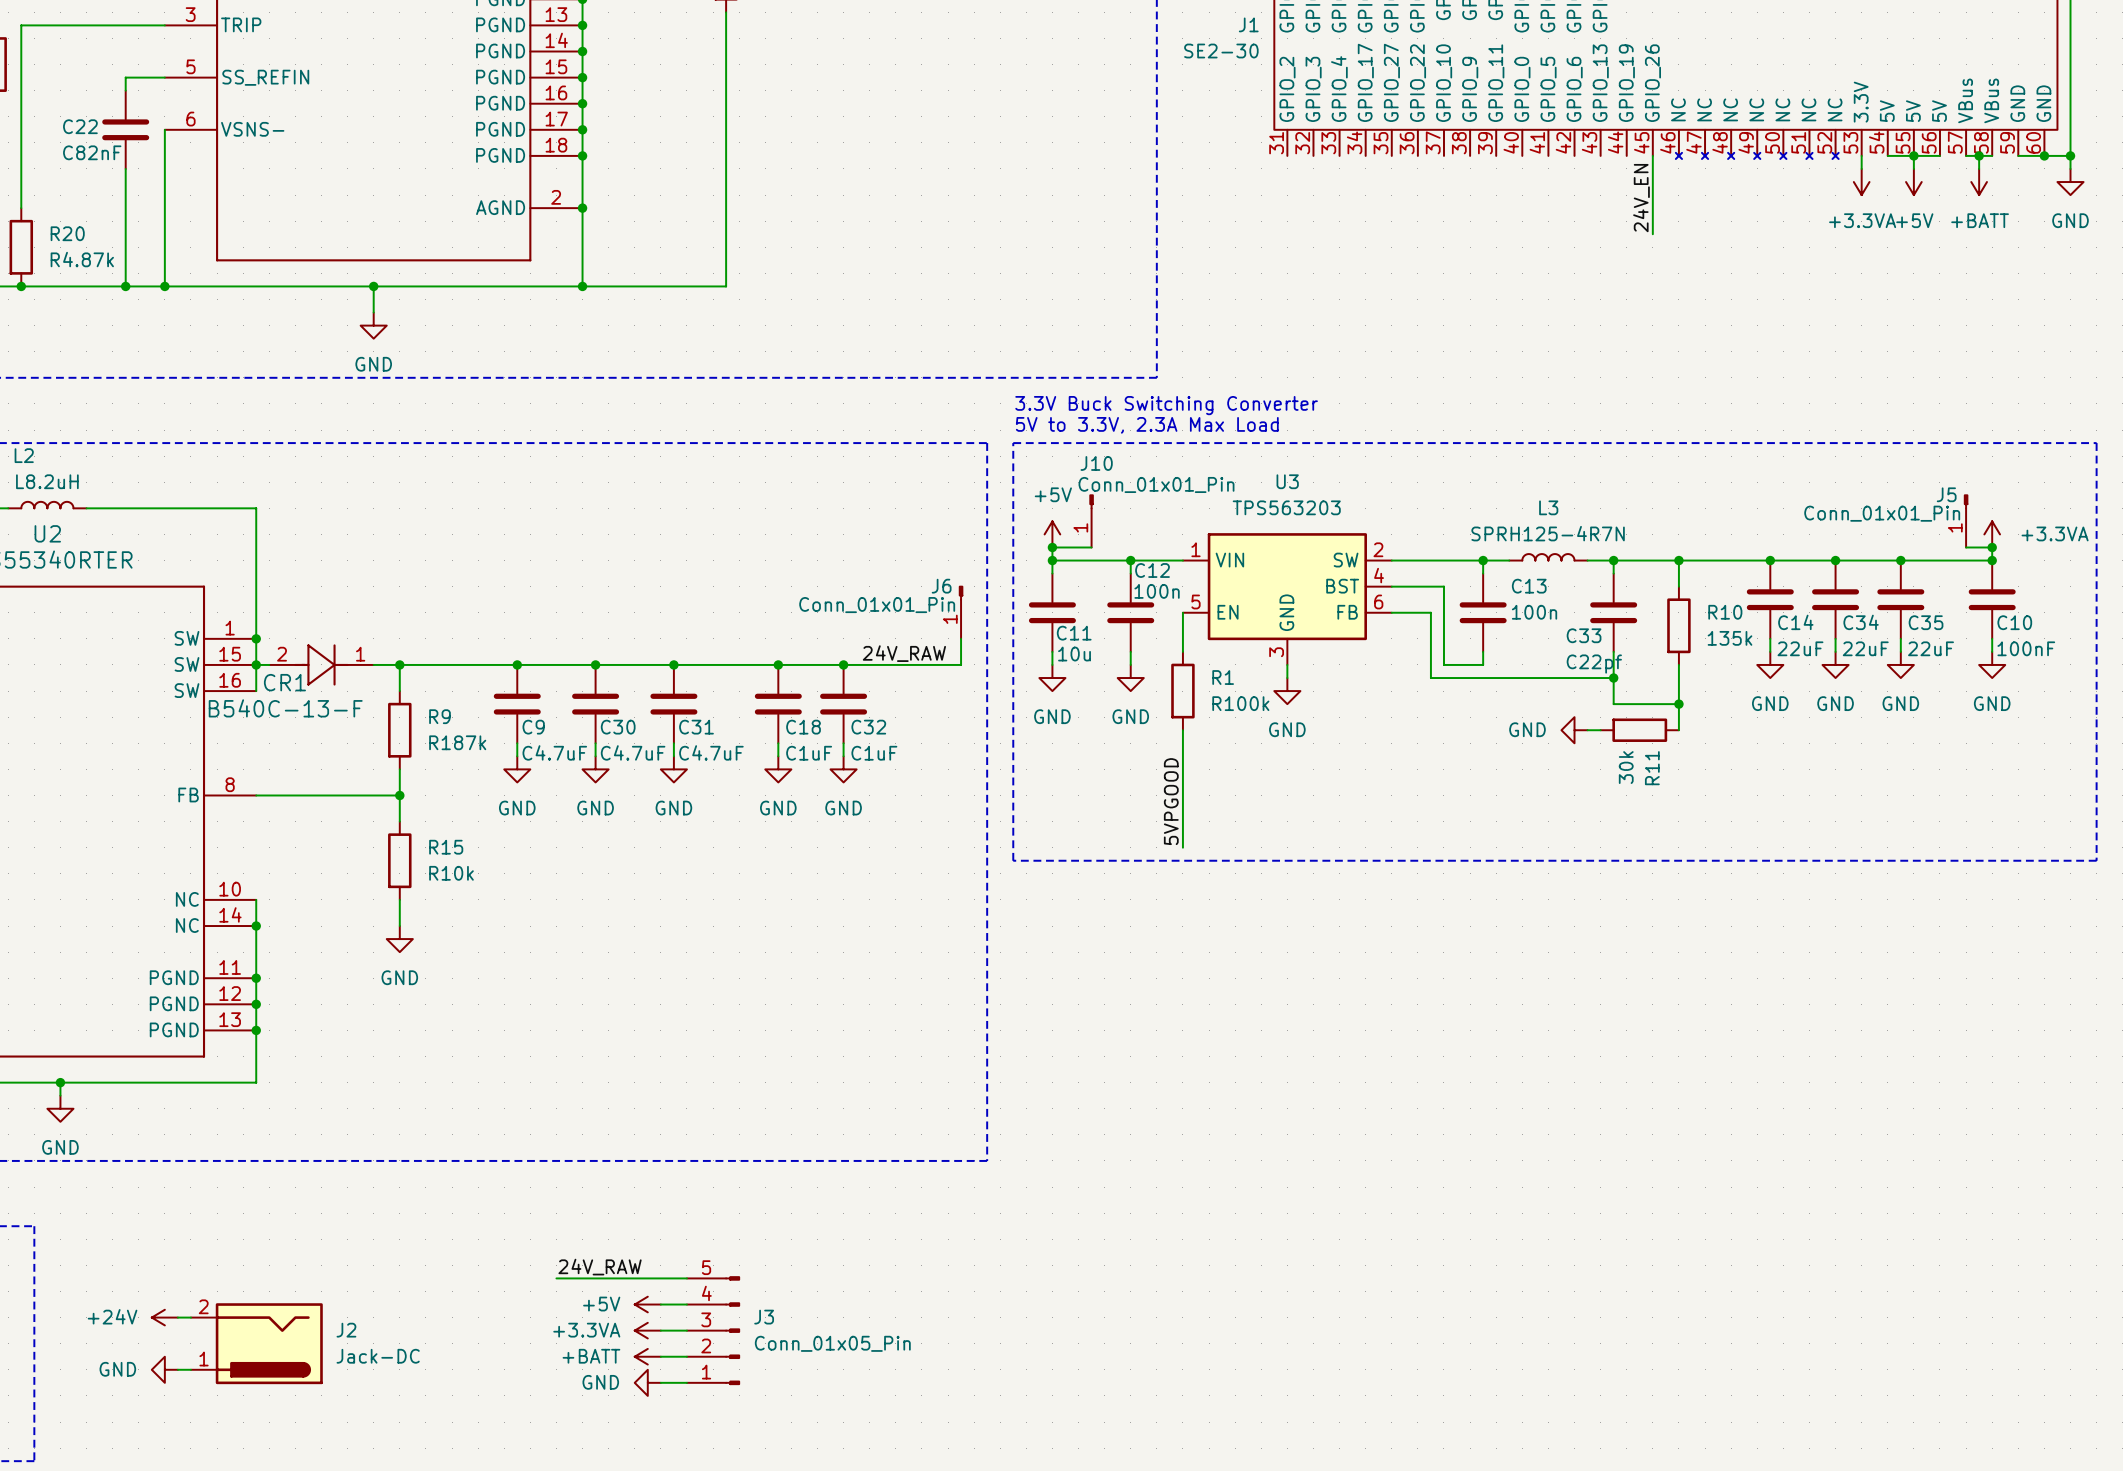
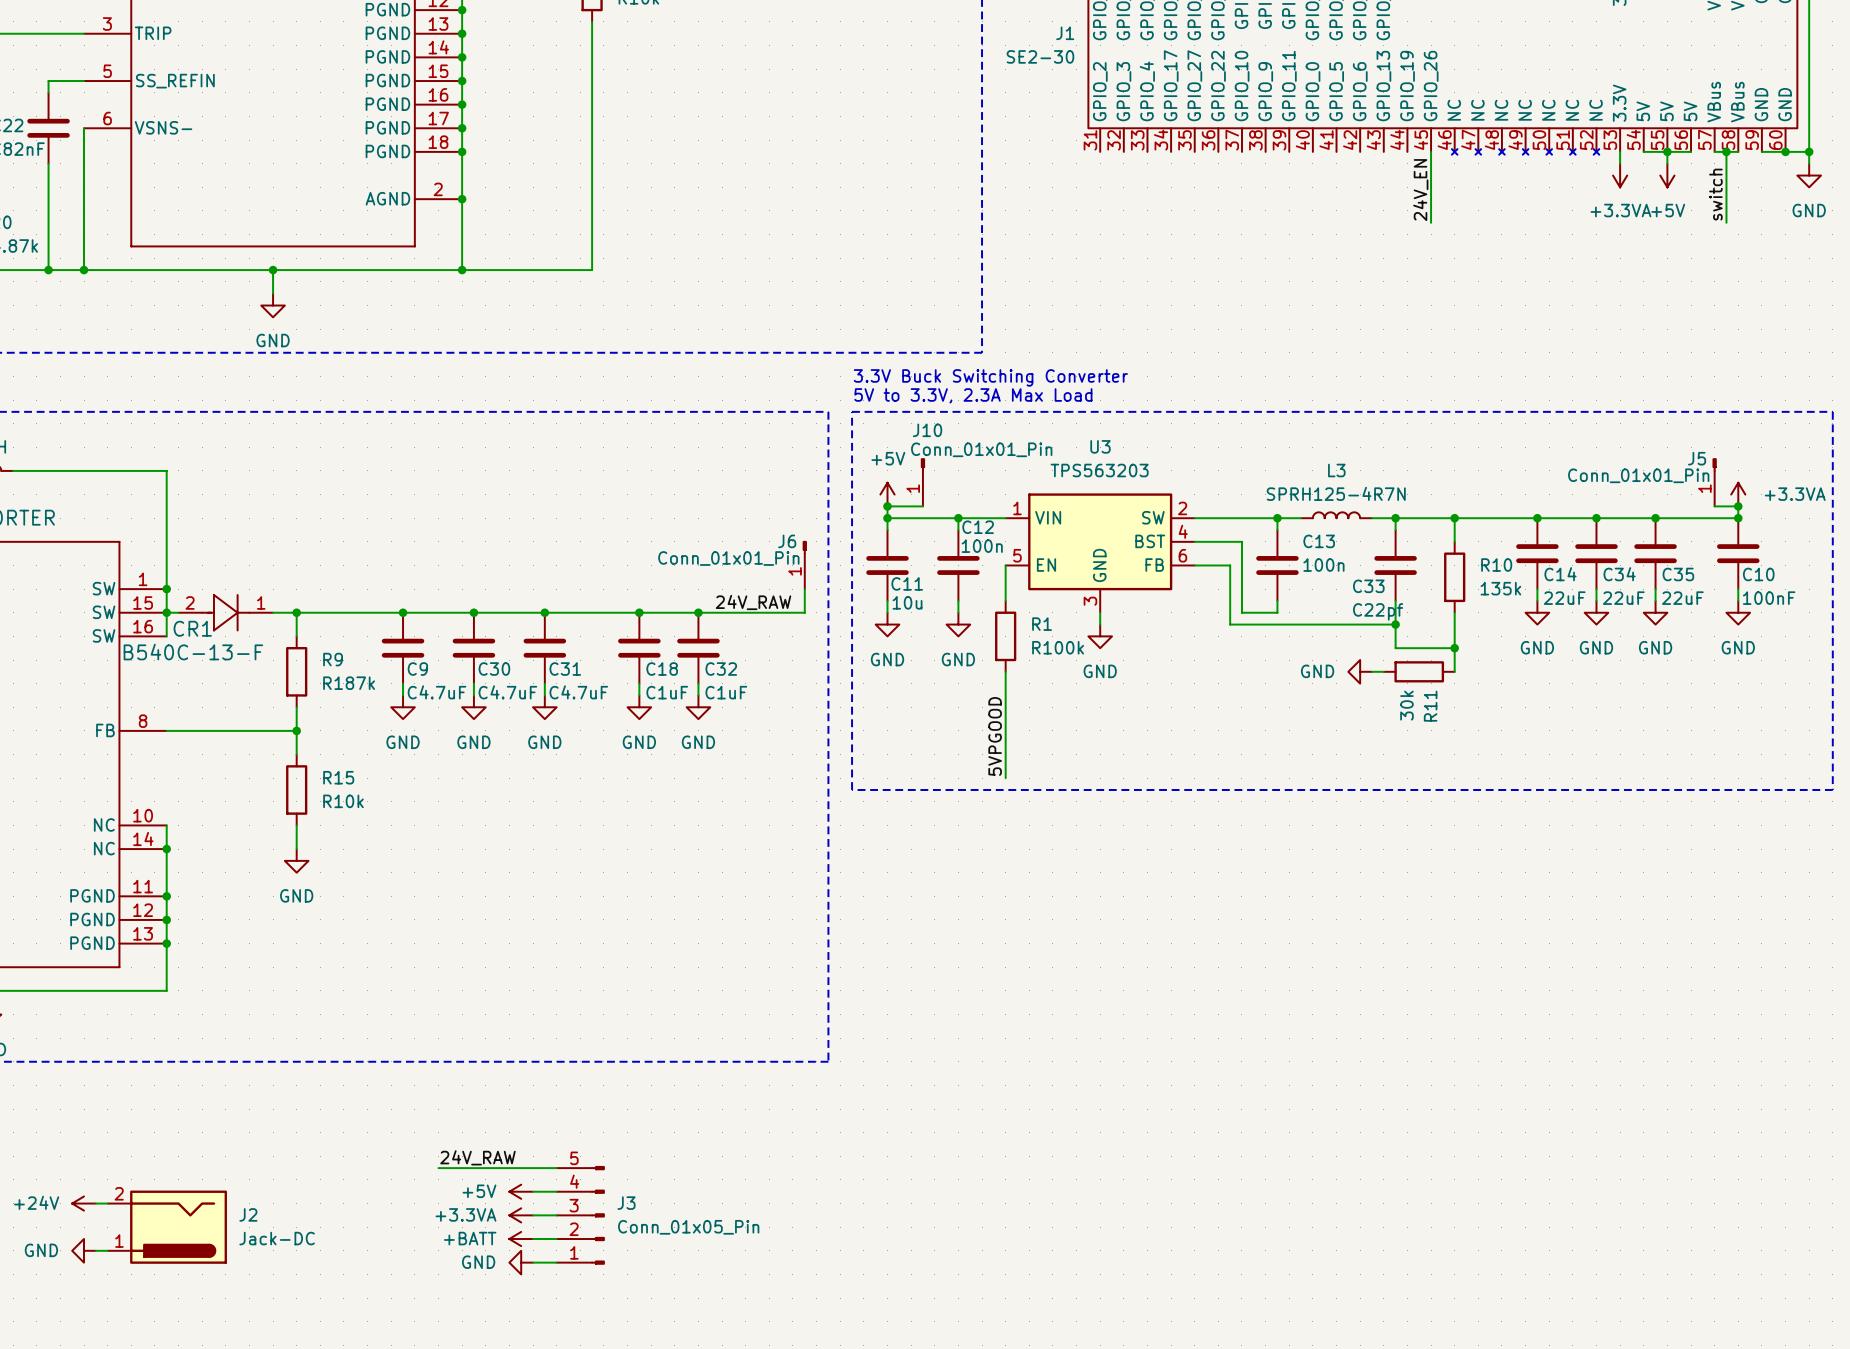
wire: none -> (1726, 163) (1726, 222)
power symbol: +BATT (1979, 182) -> none
label: none -> switch (1715, 194)

